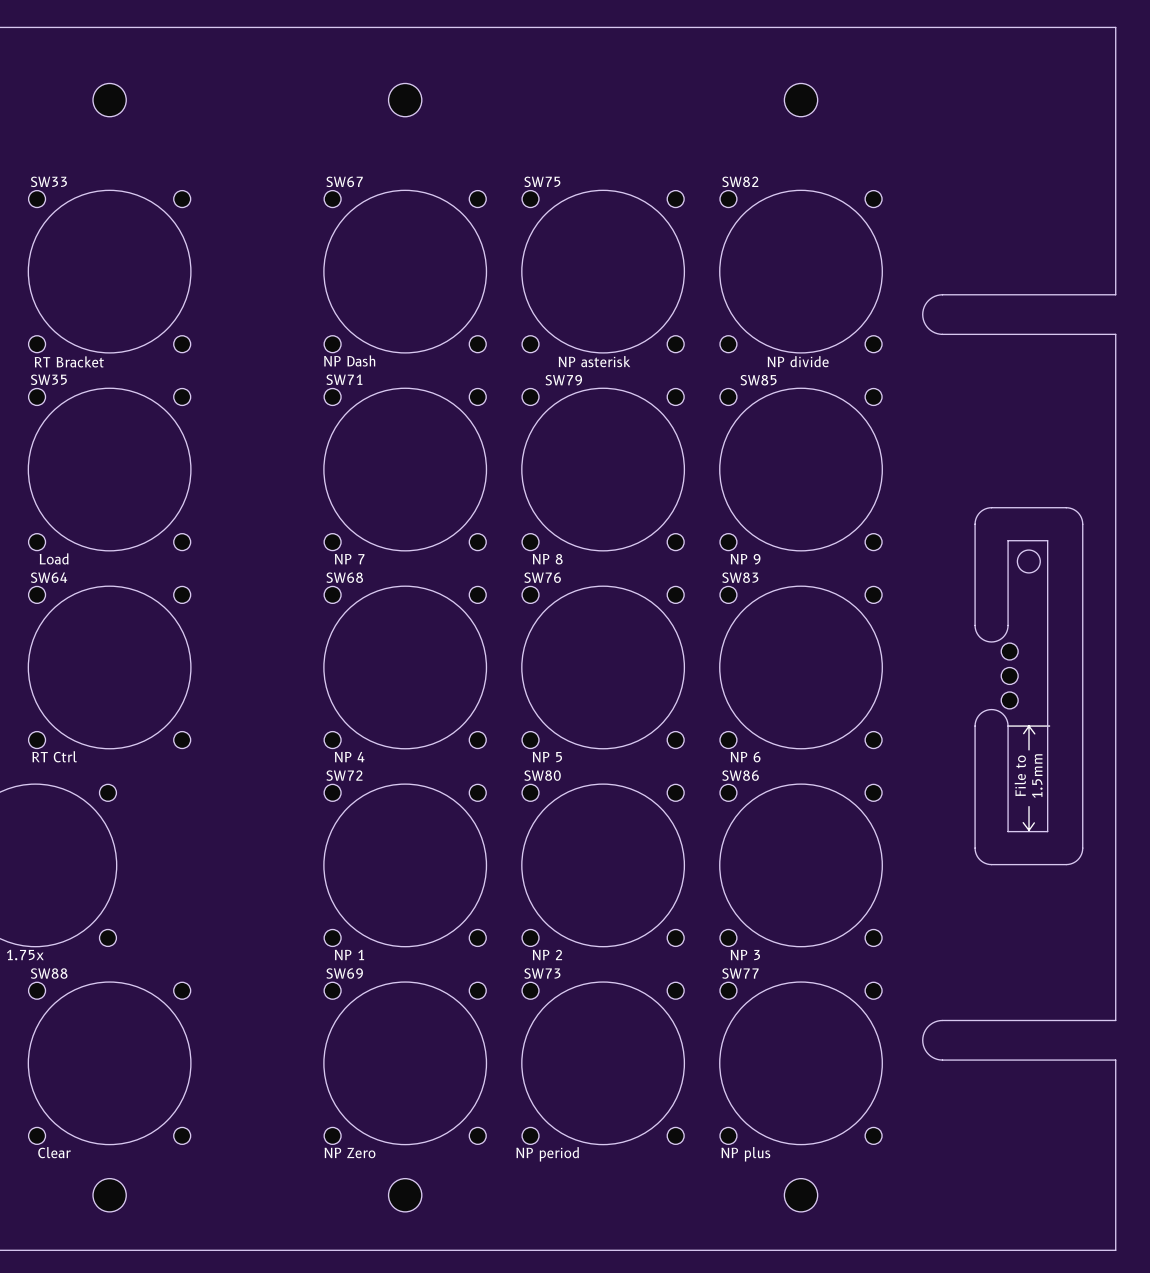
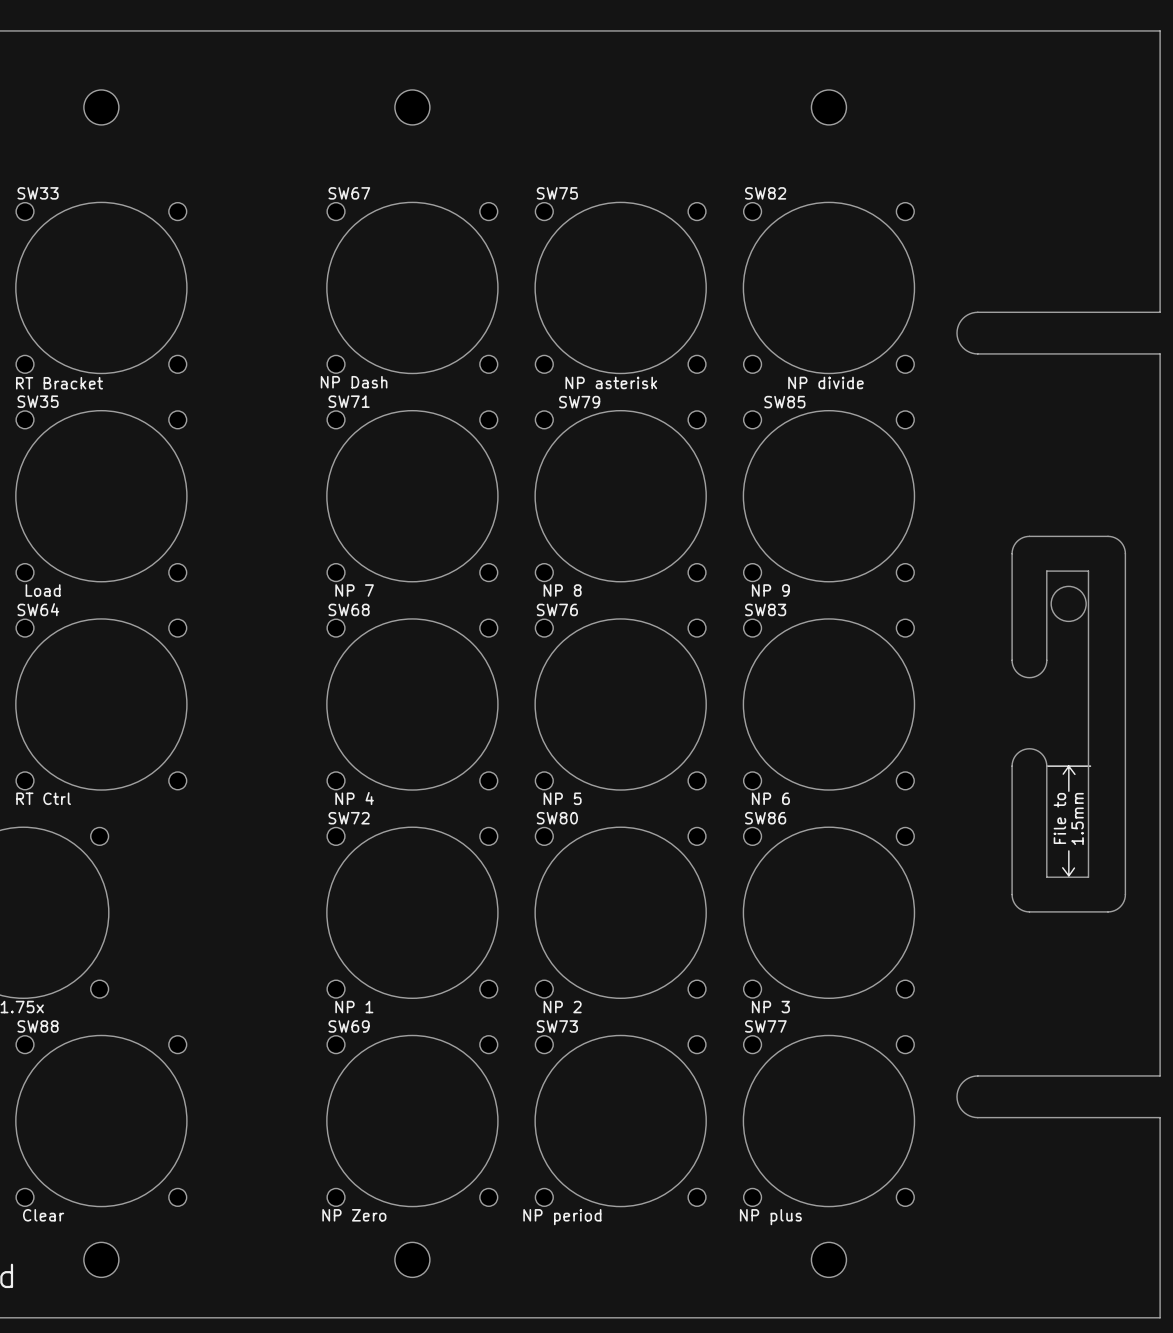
round board edge size: [1016, 549, 1041, 574] -> [1050, 585, 1087, 622]
part: (1009, 651) -> none
part: (1009, 675) -> none
part: (1009, 700) -> none

